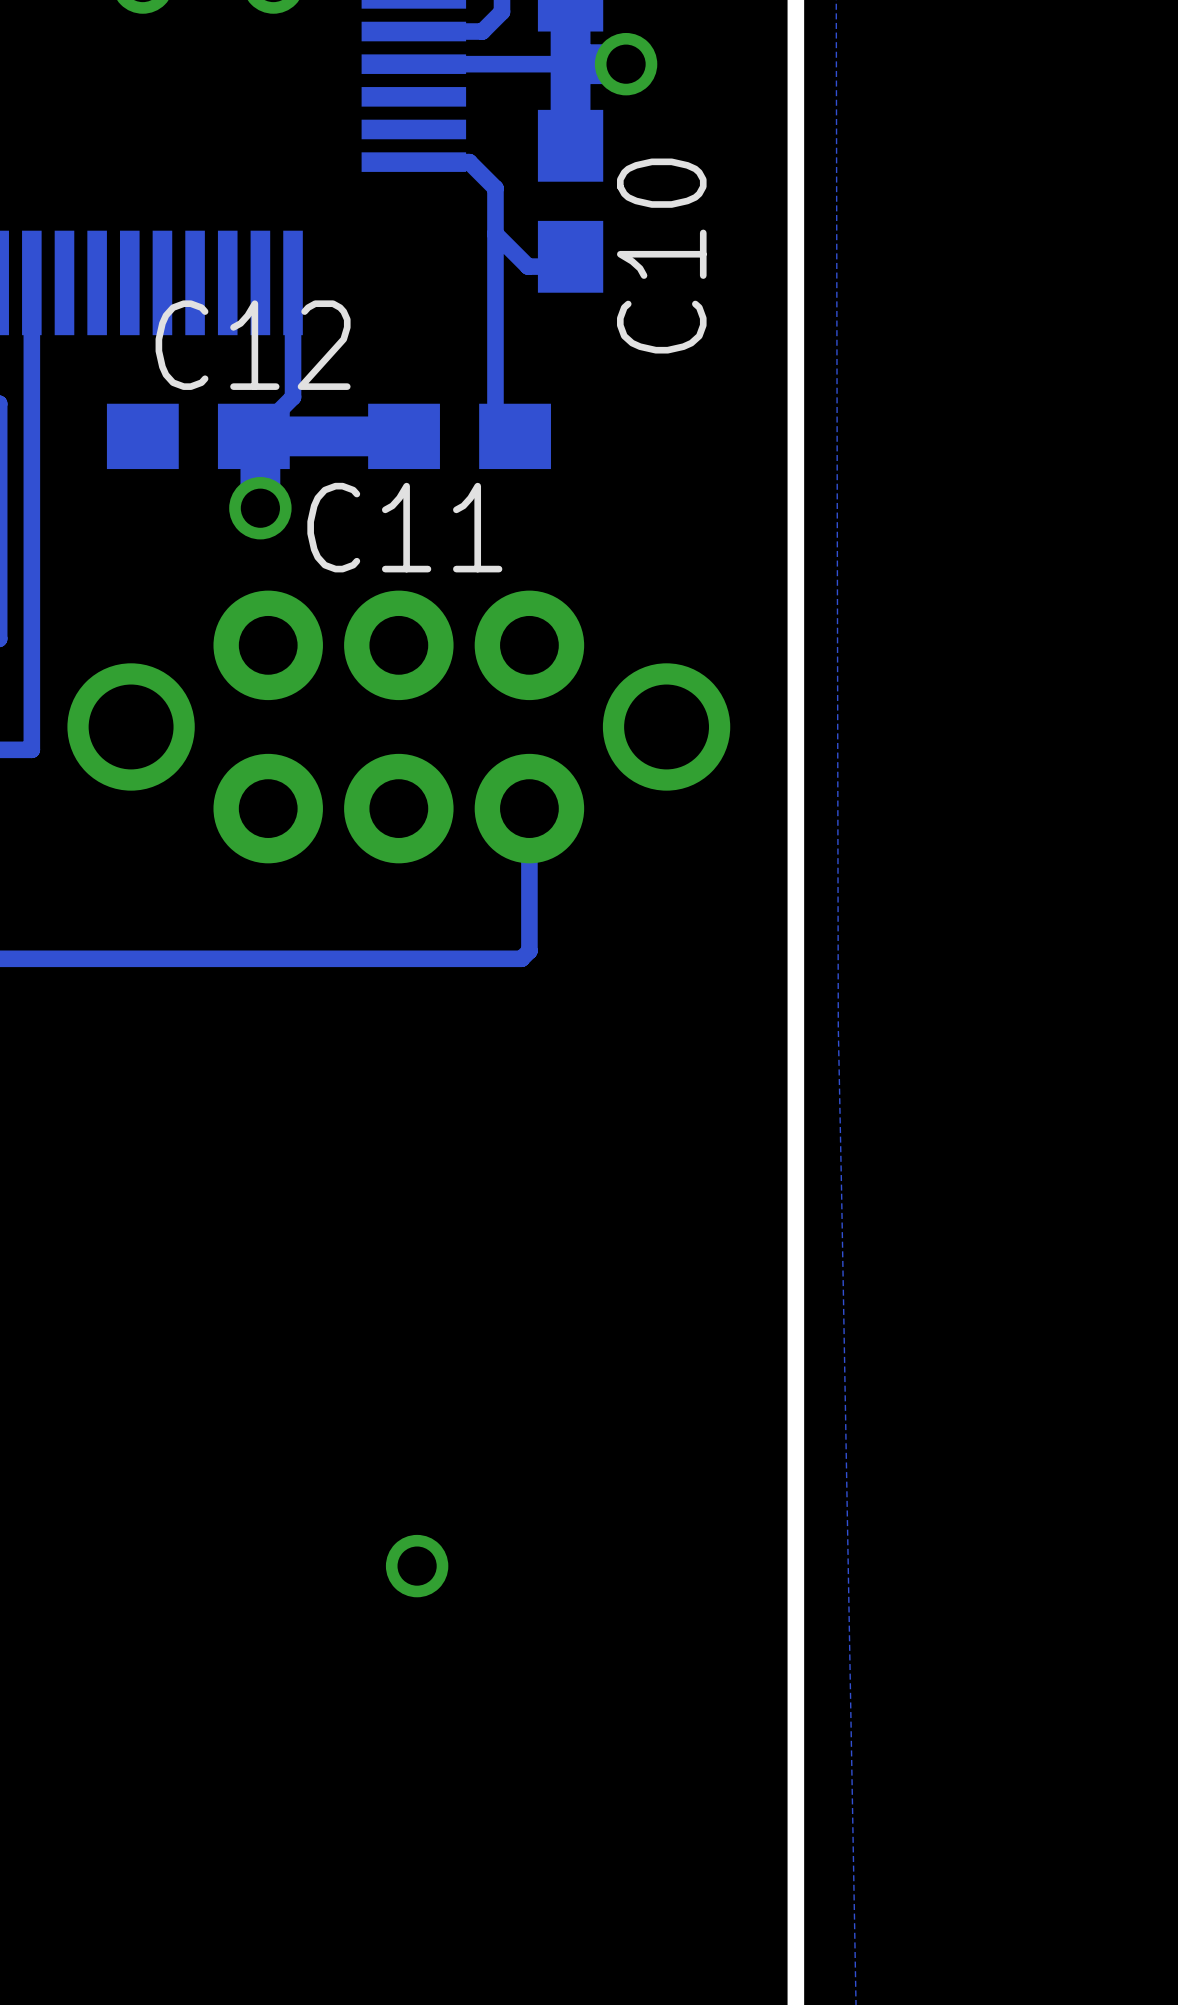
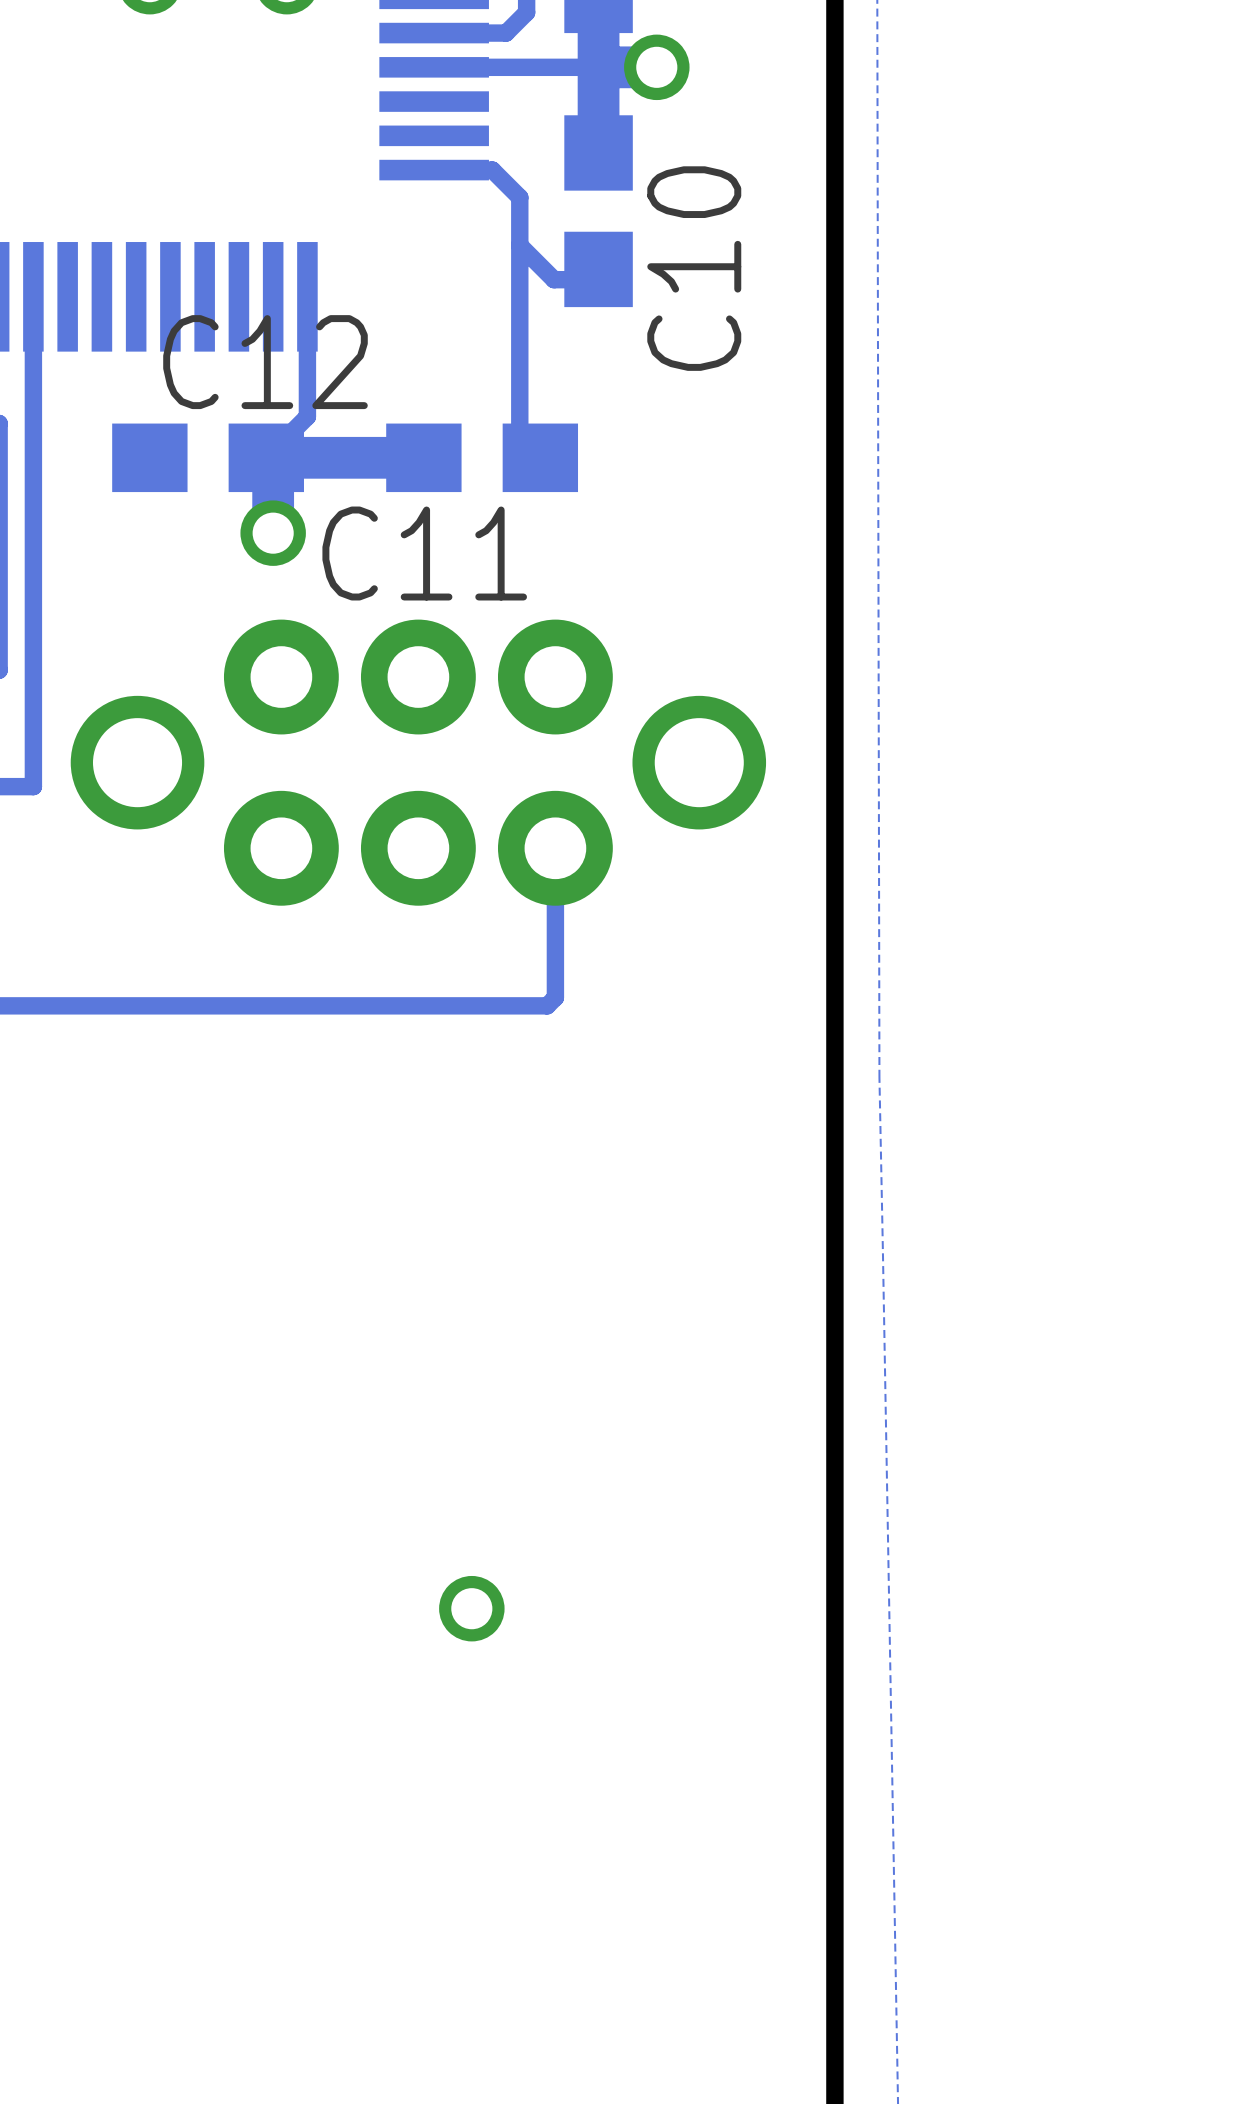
via position: (417, 1566) -> (471, 1608)

